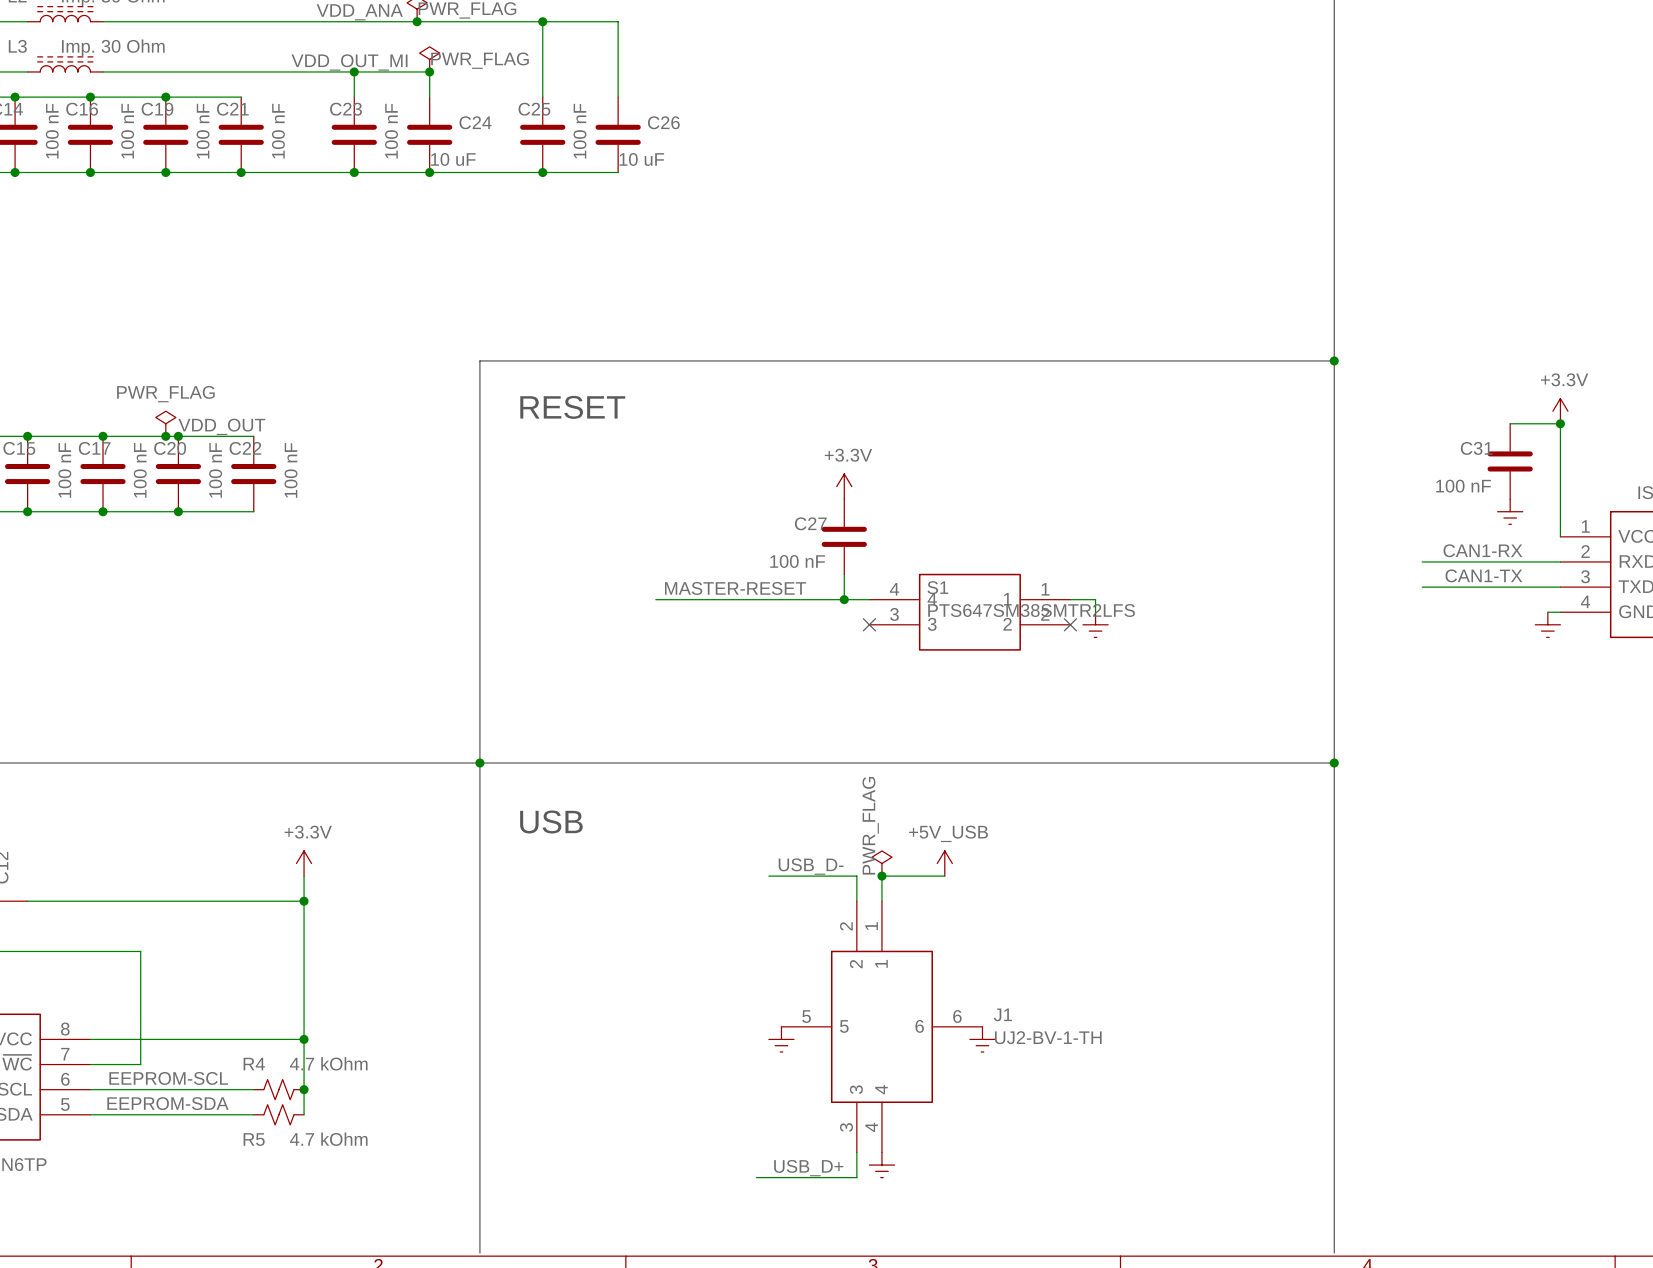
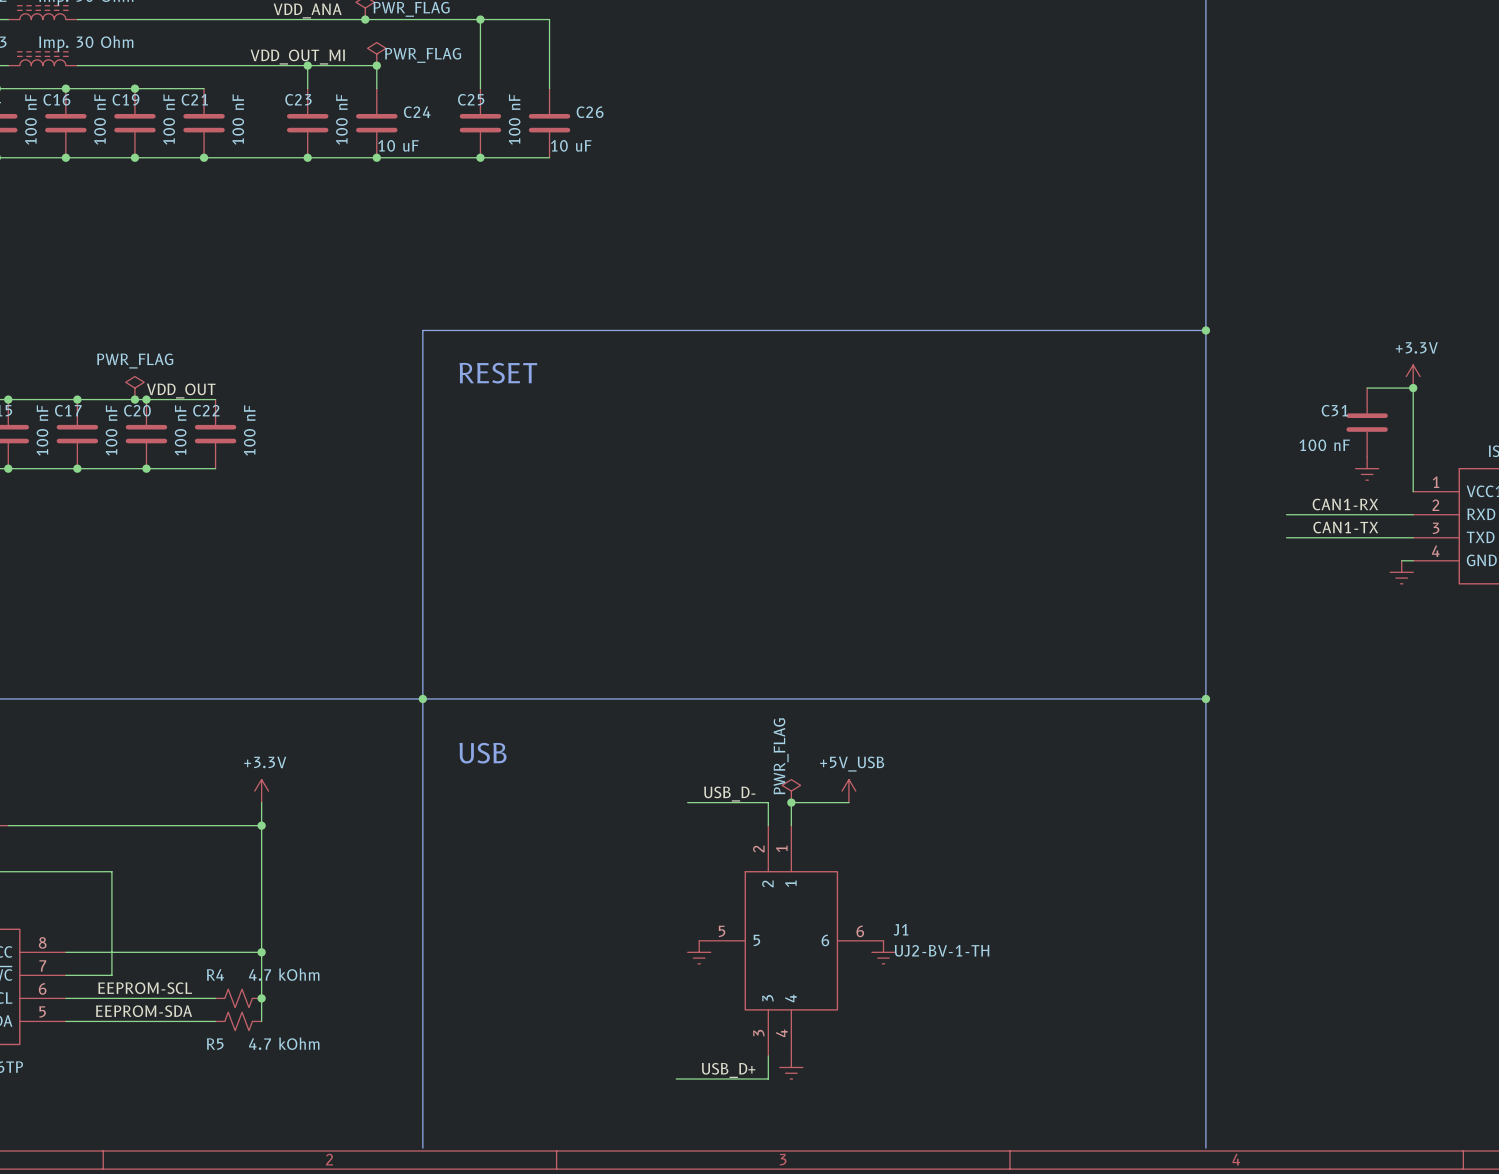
power symbol: +3.3V (844, 486) -> none
C27: 100 nF (844, 536) -> none
wire: (844, 574) (844, 599) -> none
label: MASTER-RESET (735, 588) -> none
wire: (655, 599) (869, 599) -> none
junction: (844, 599) -> none
wire: (1070, 599) (1095, 599) (1095, 612) -> none
S1: PTS647SM38SMTR2LFS (969, 612) -> none
no-connect mark: (869, 624) -> none
no-connect mark: (1070, 624) -> none
power symbol: (1095, 624) -> none

